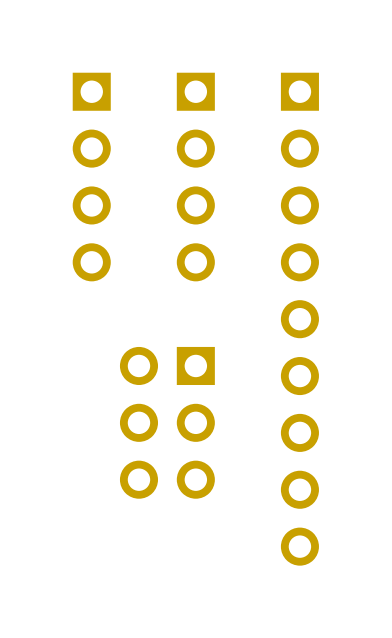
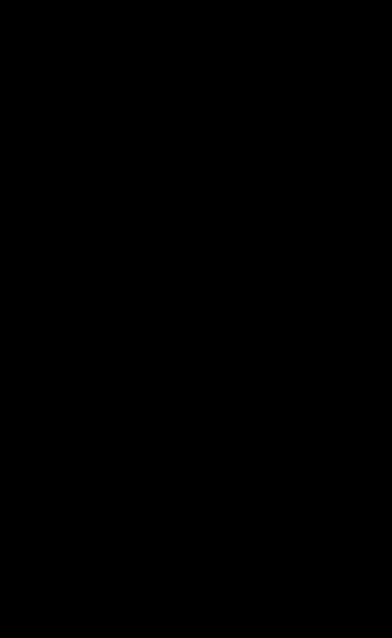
part: (91, 177) -> none
part: (195, 177) -> none
part: (299, 319) -> none
part: (167, 422) -> none

